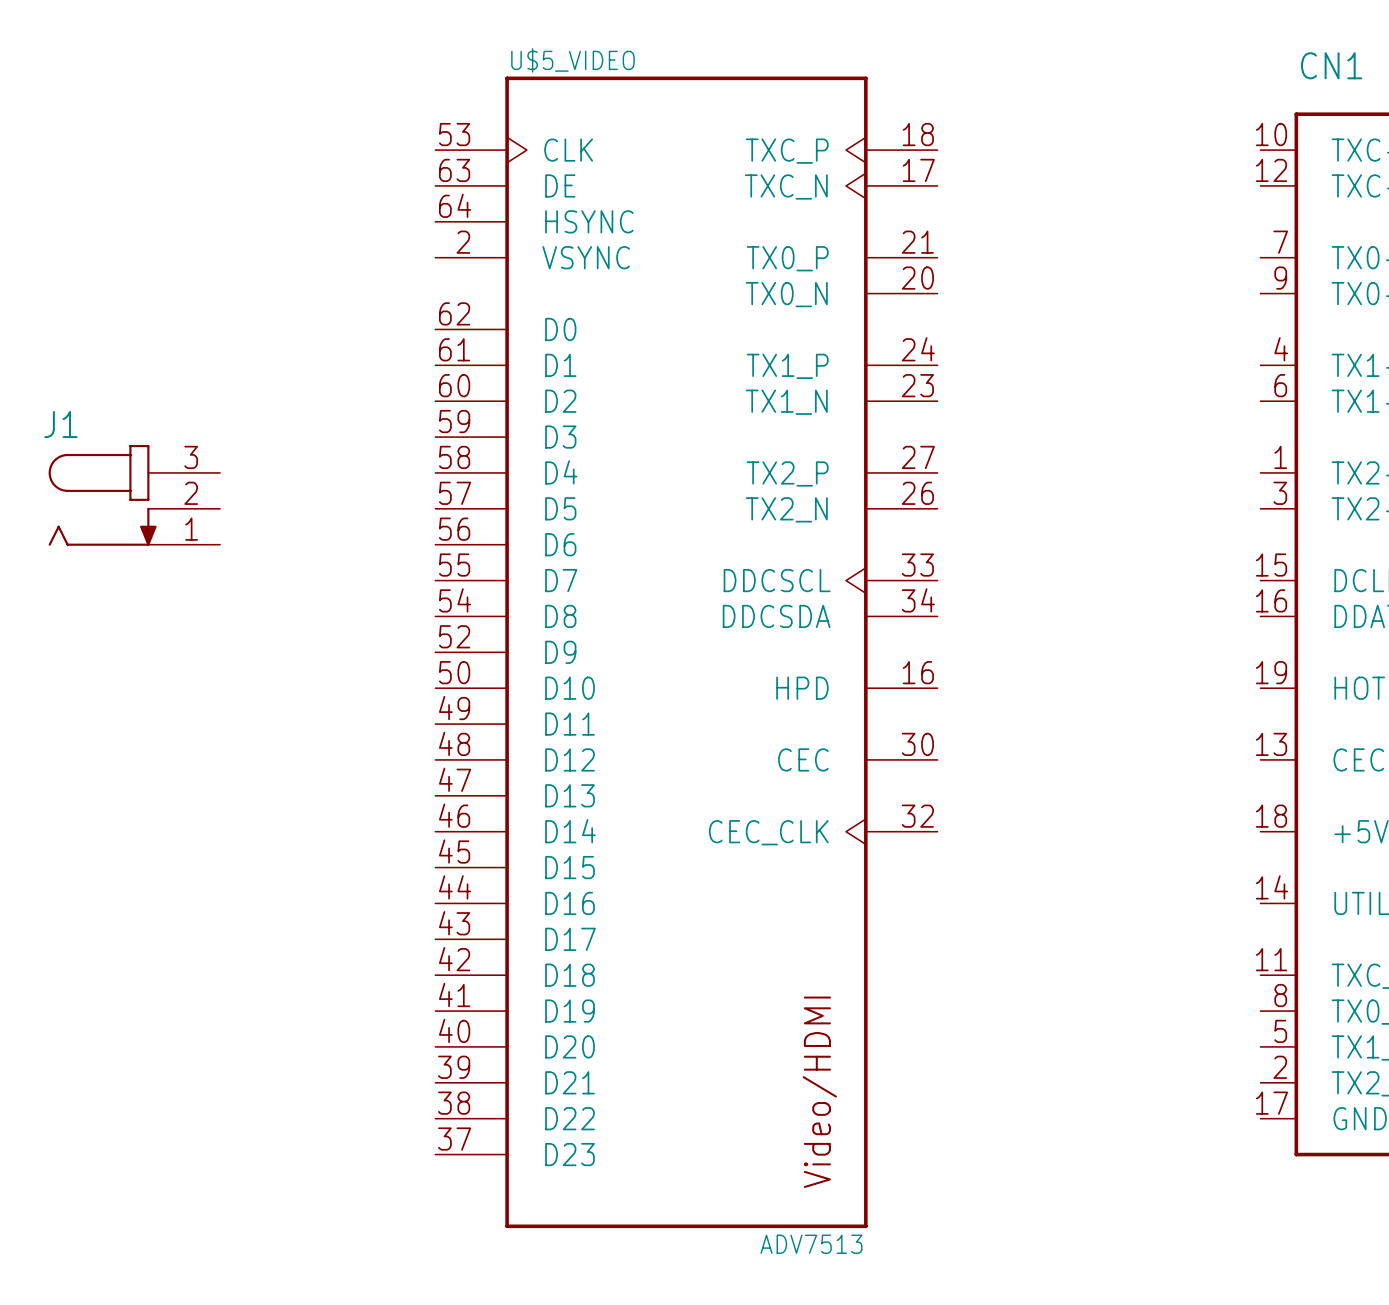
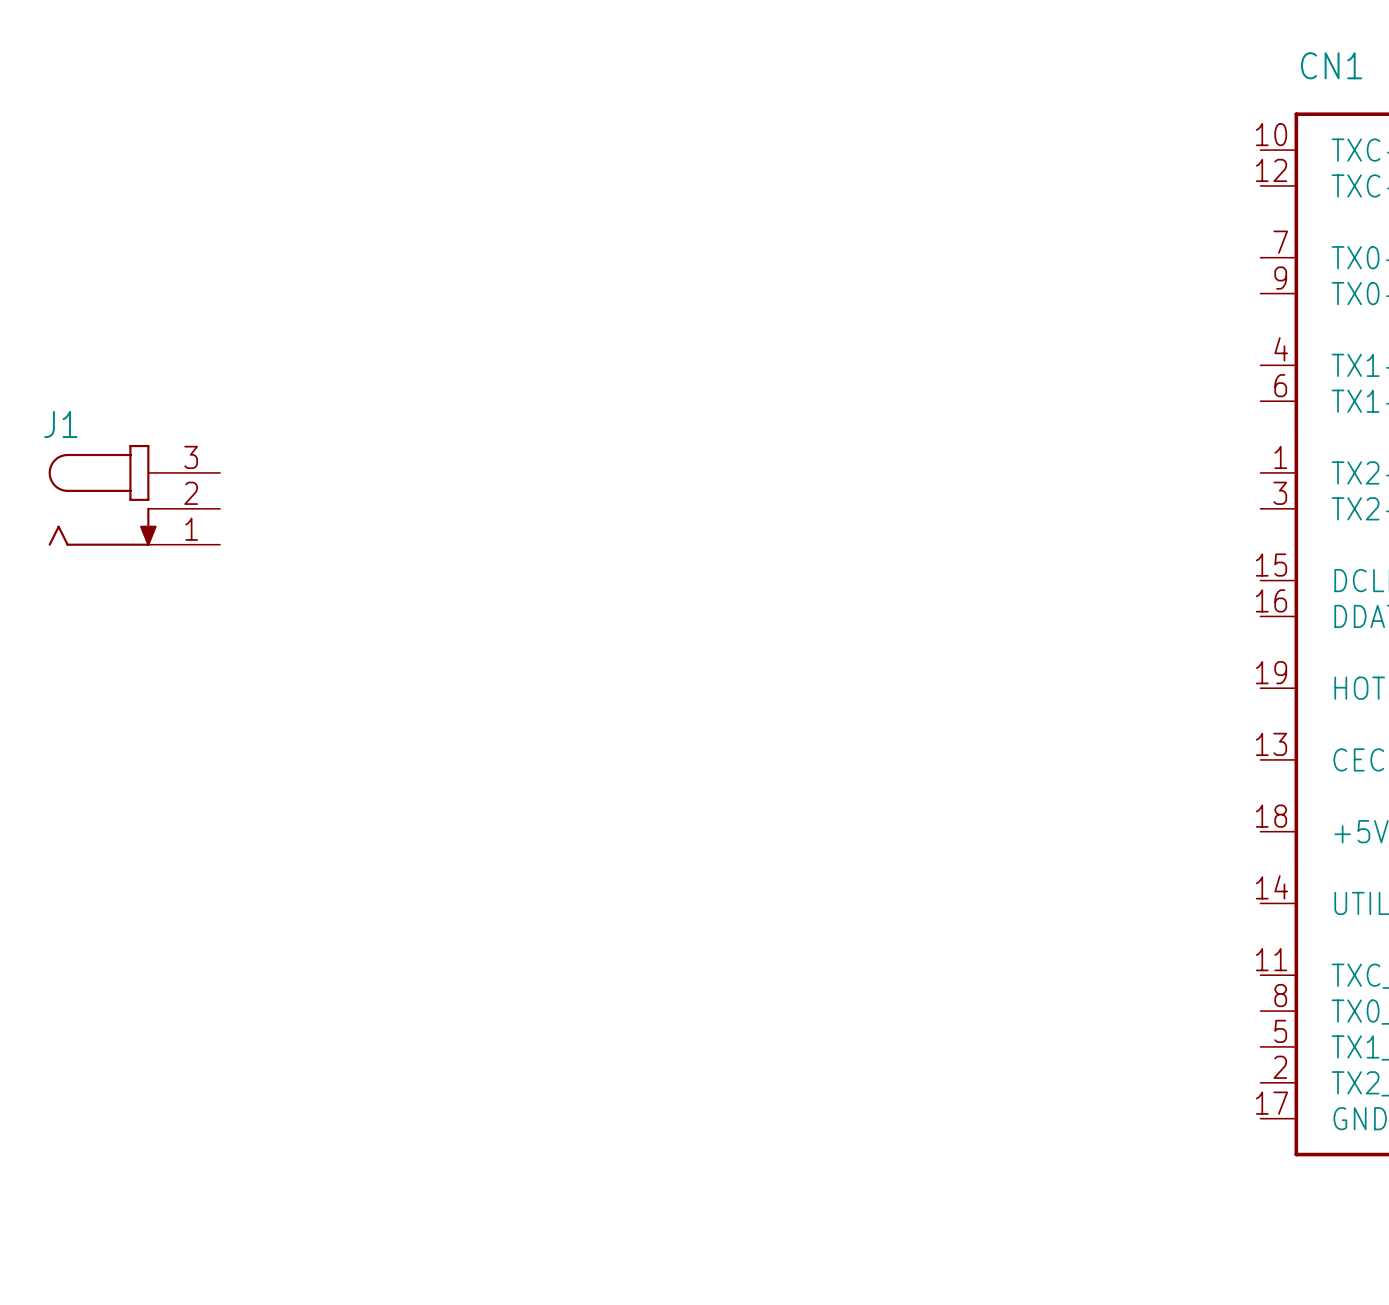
U$5_VIDEO: ADV7513 (686, 652) -> none

